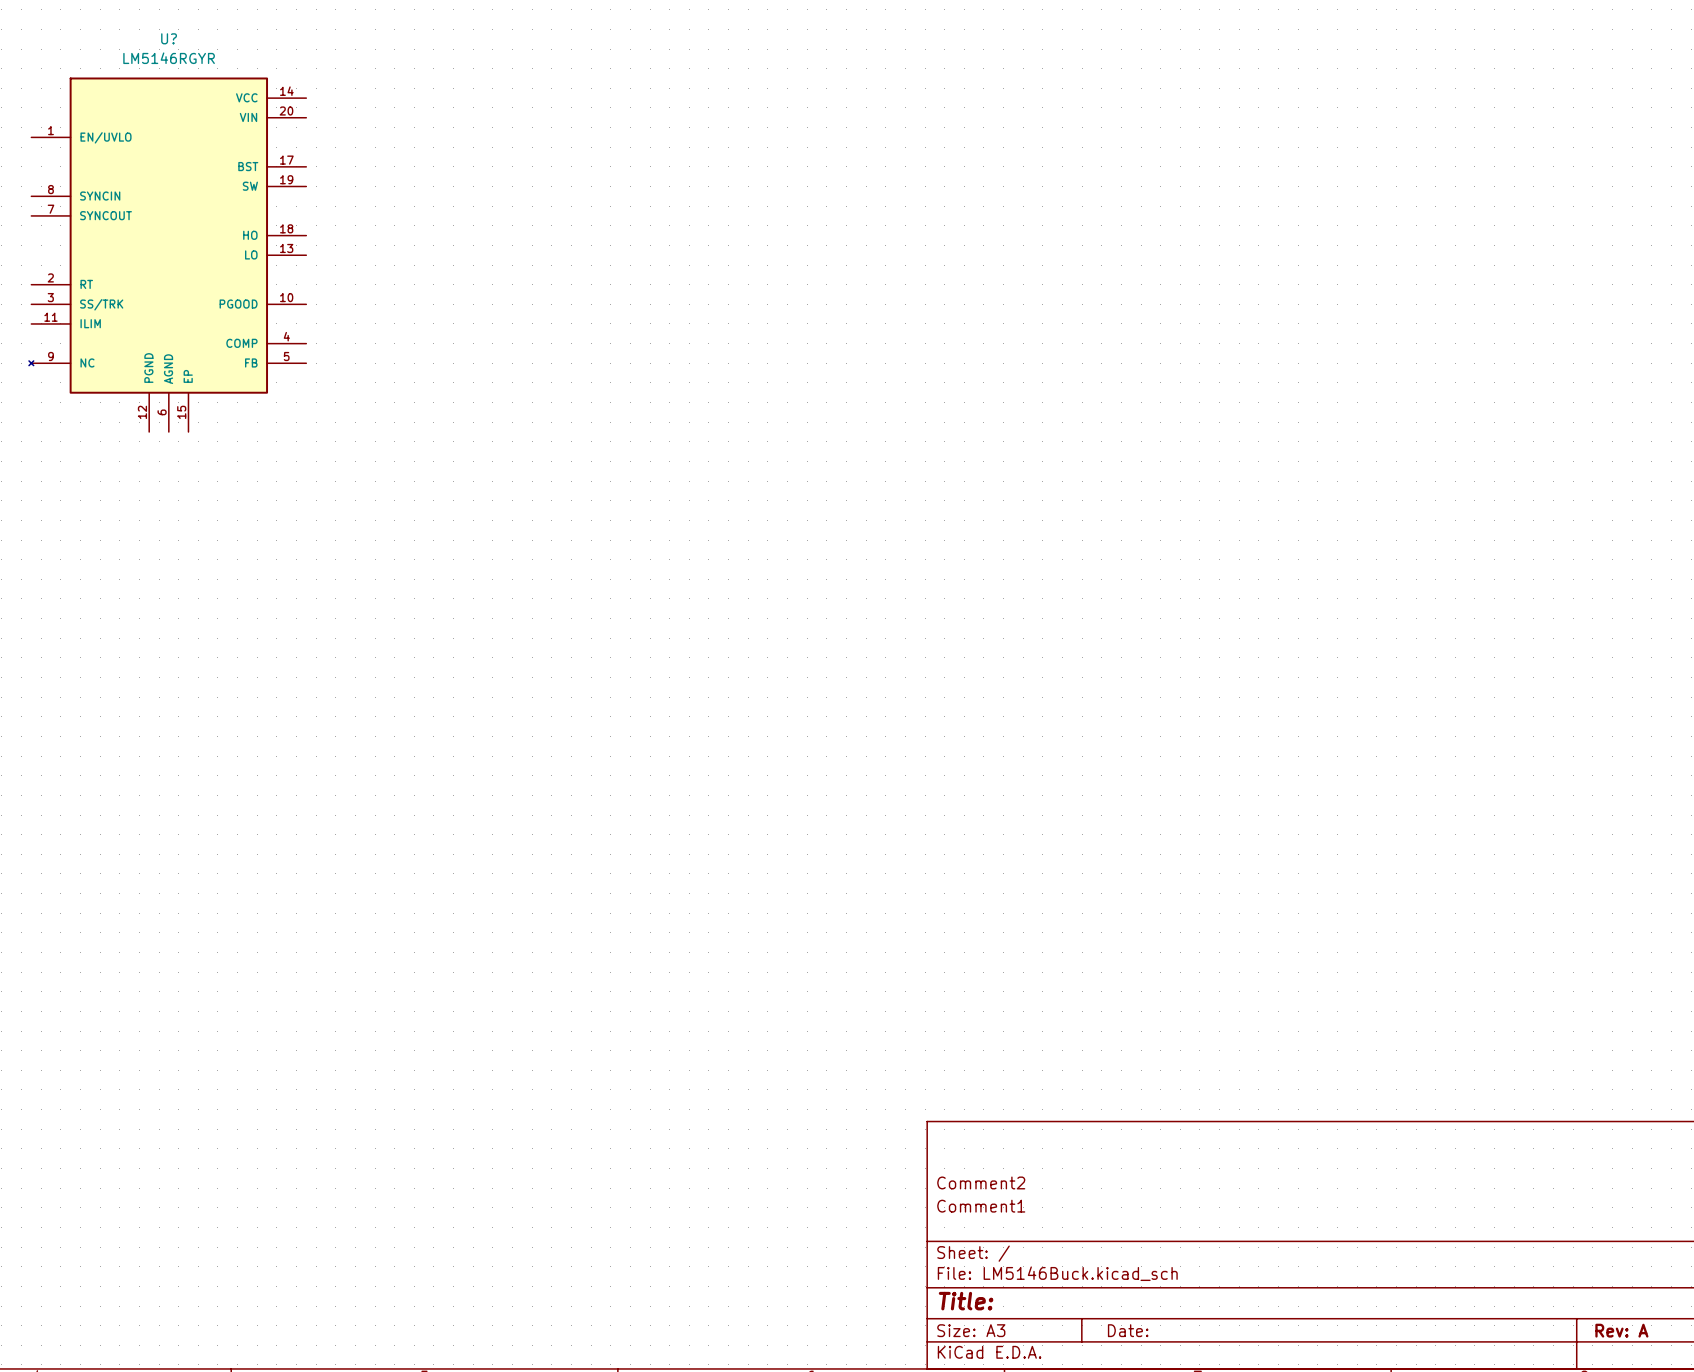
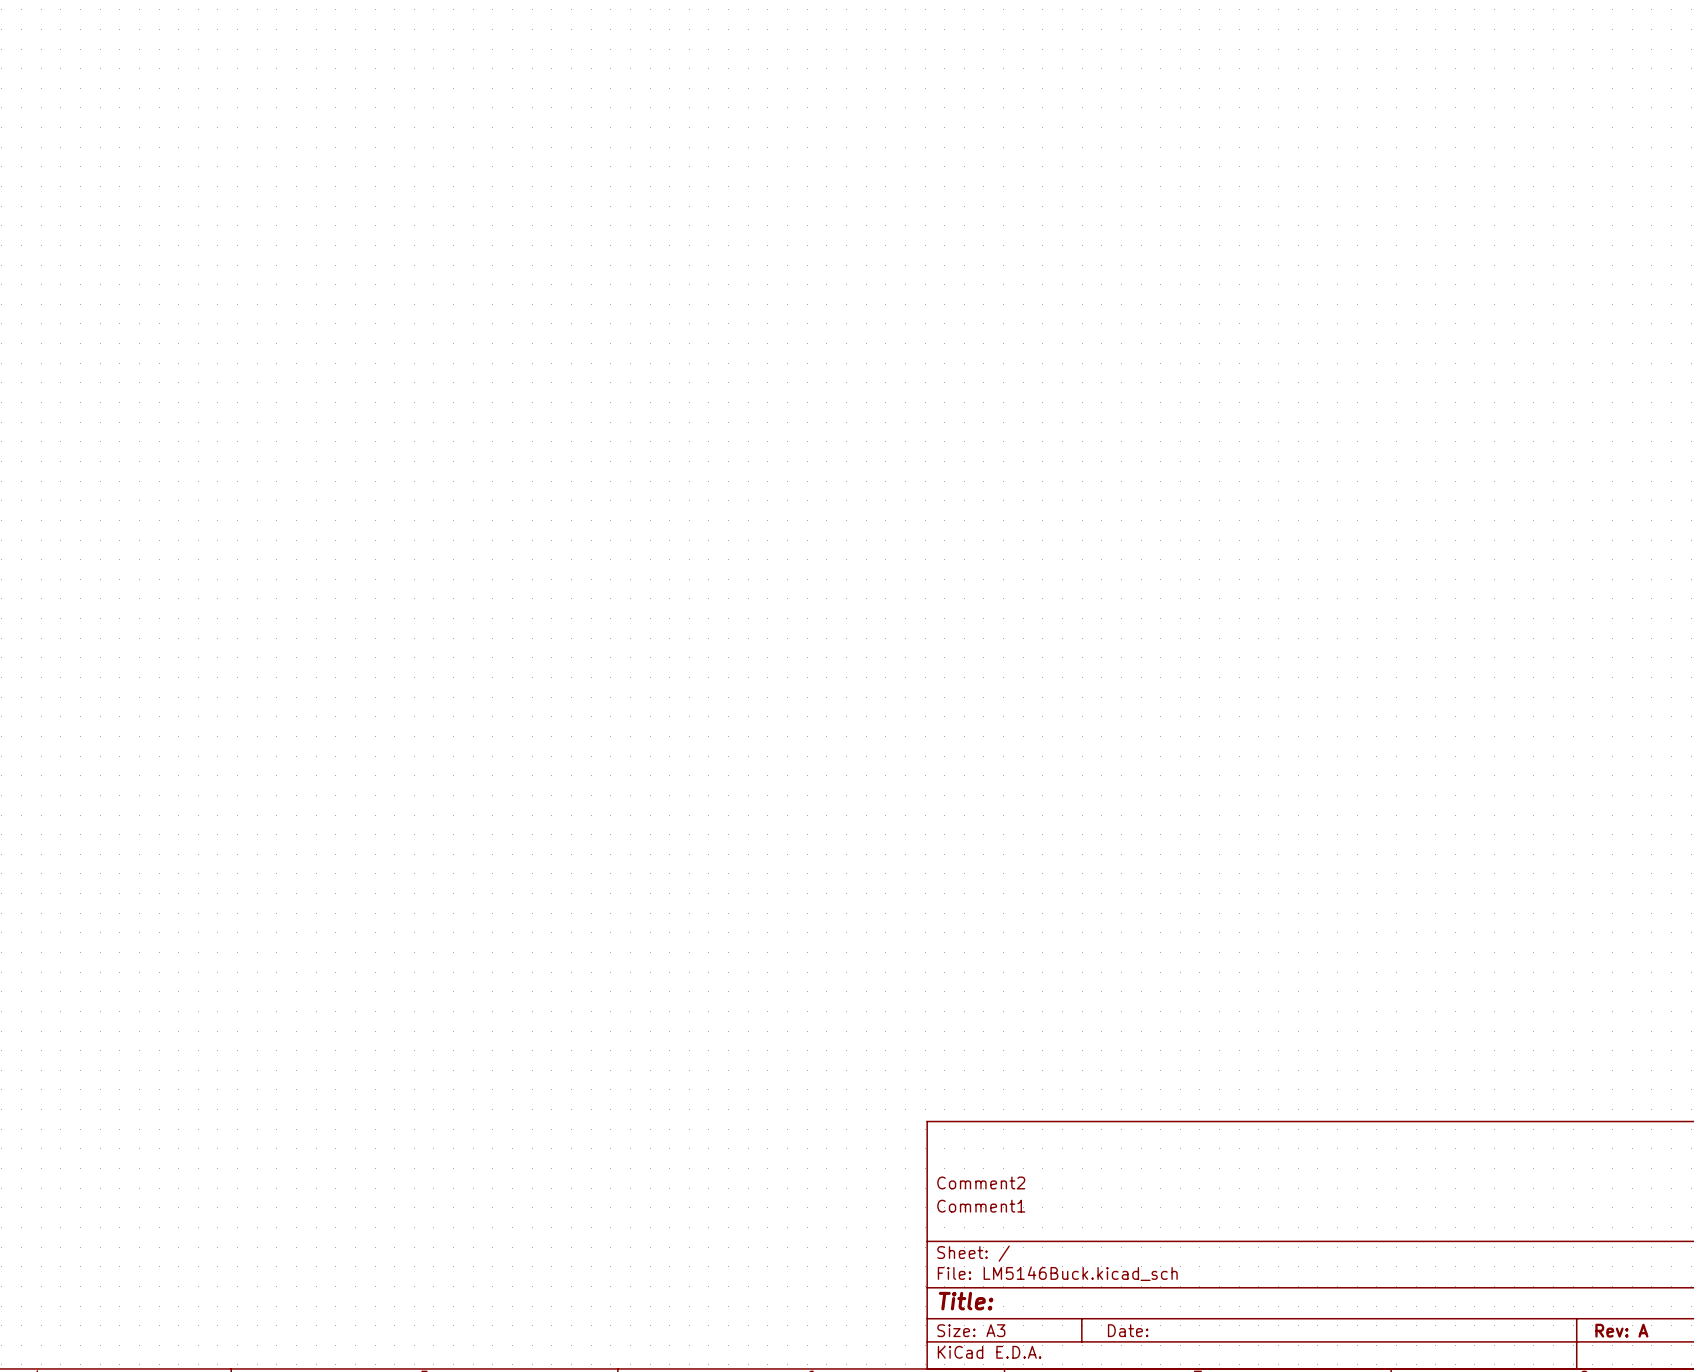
U?: LM5146RGYR (167, 254) -> none

